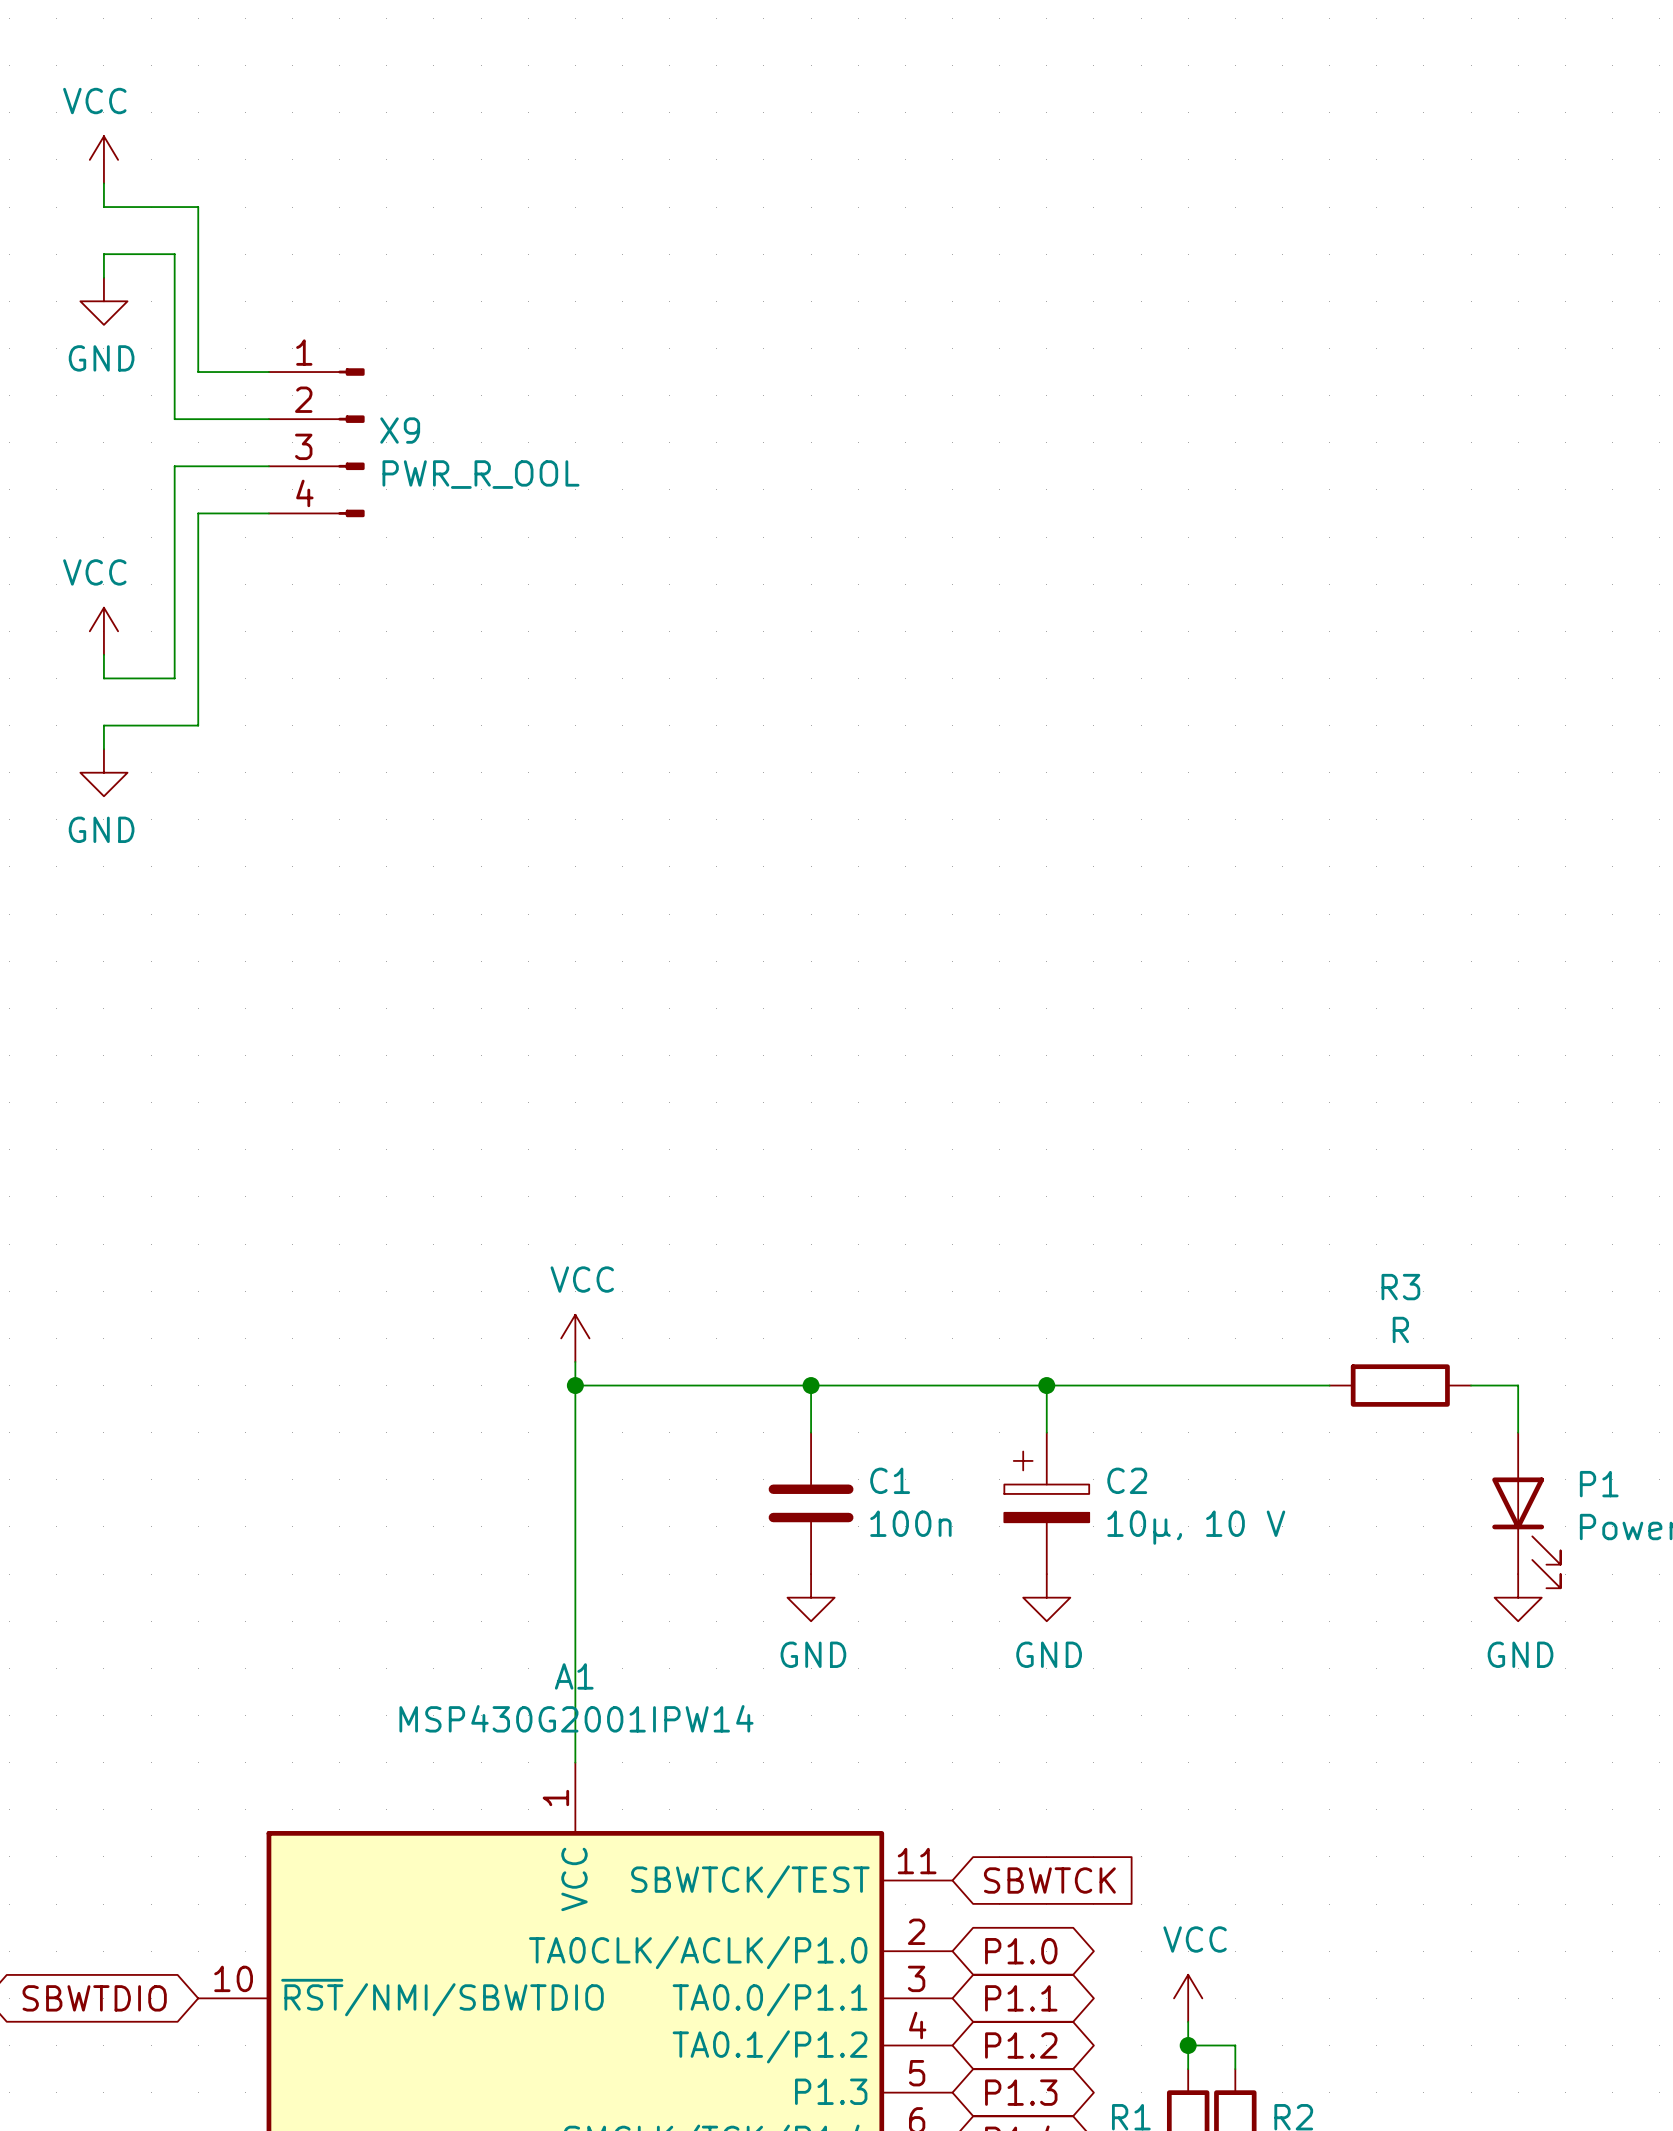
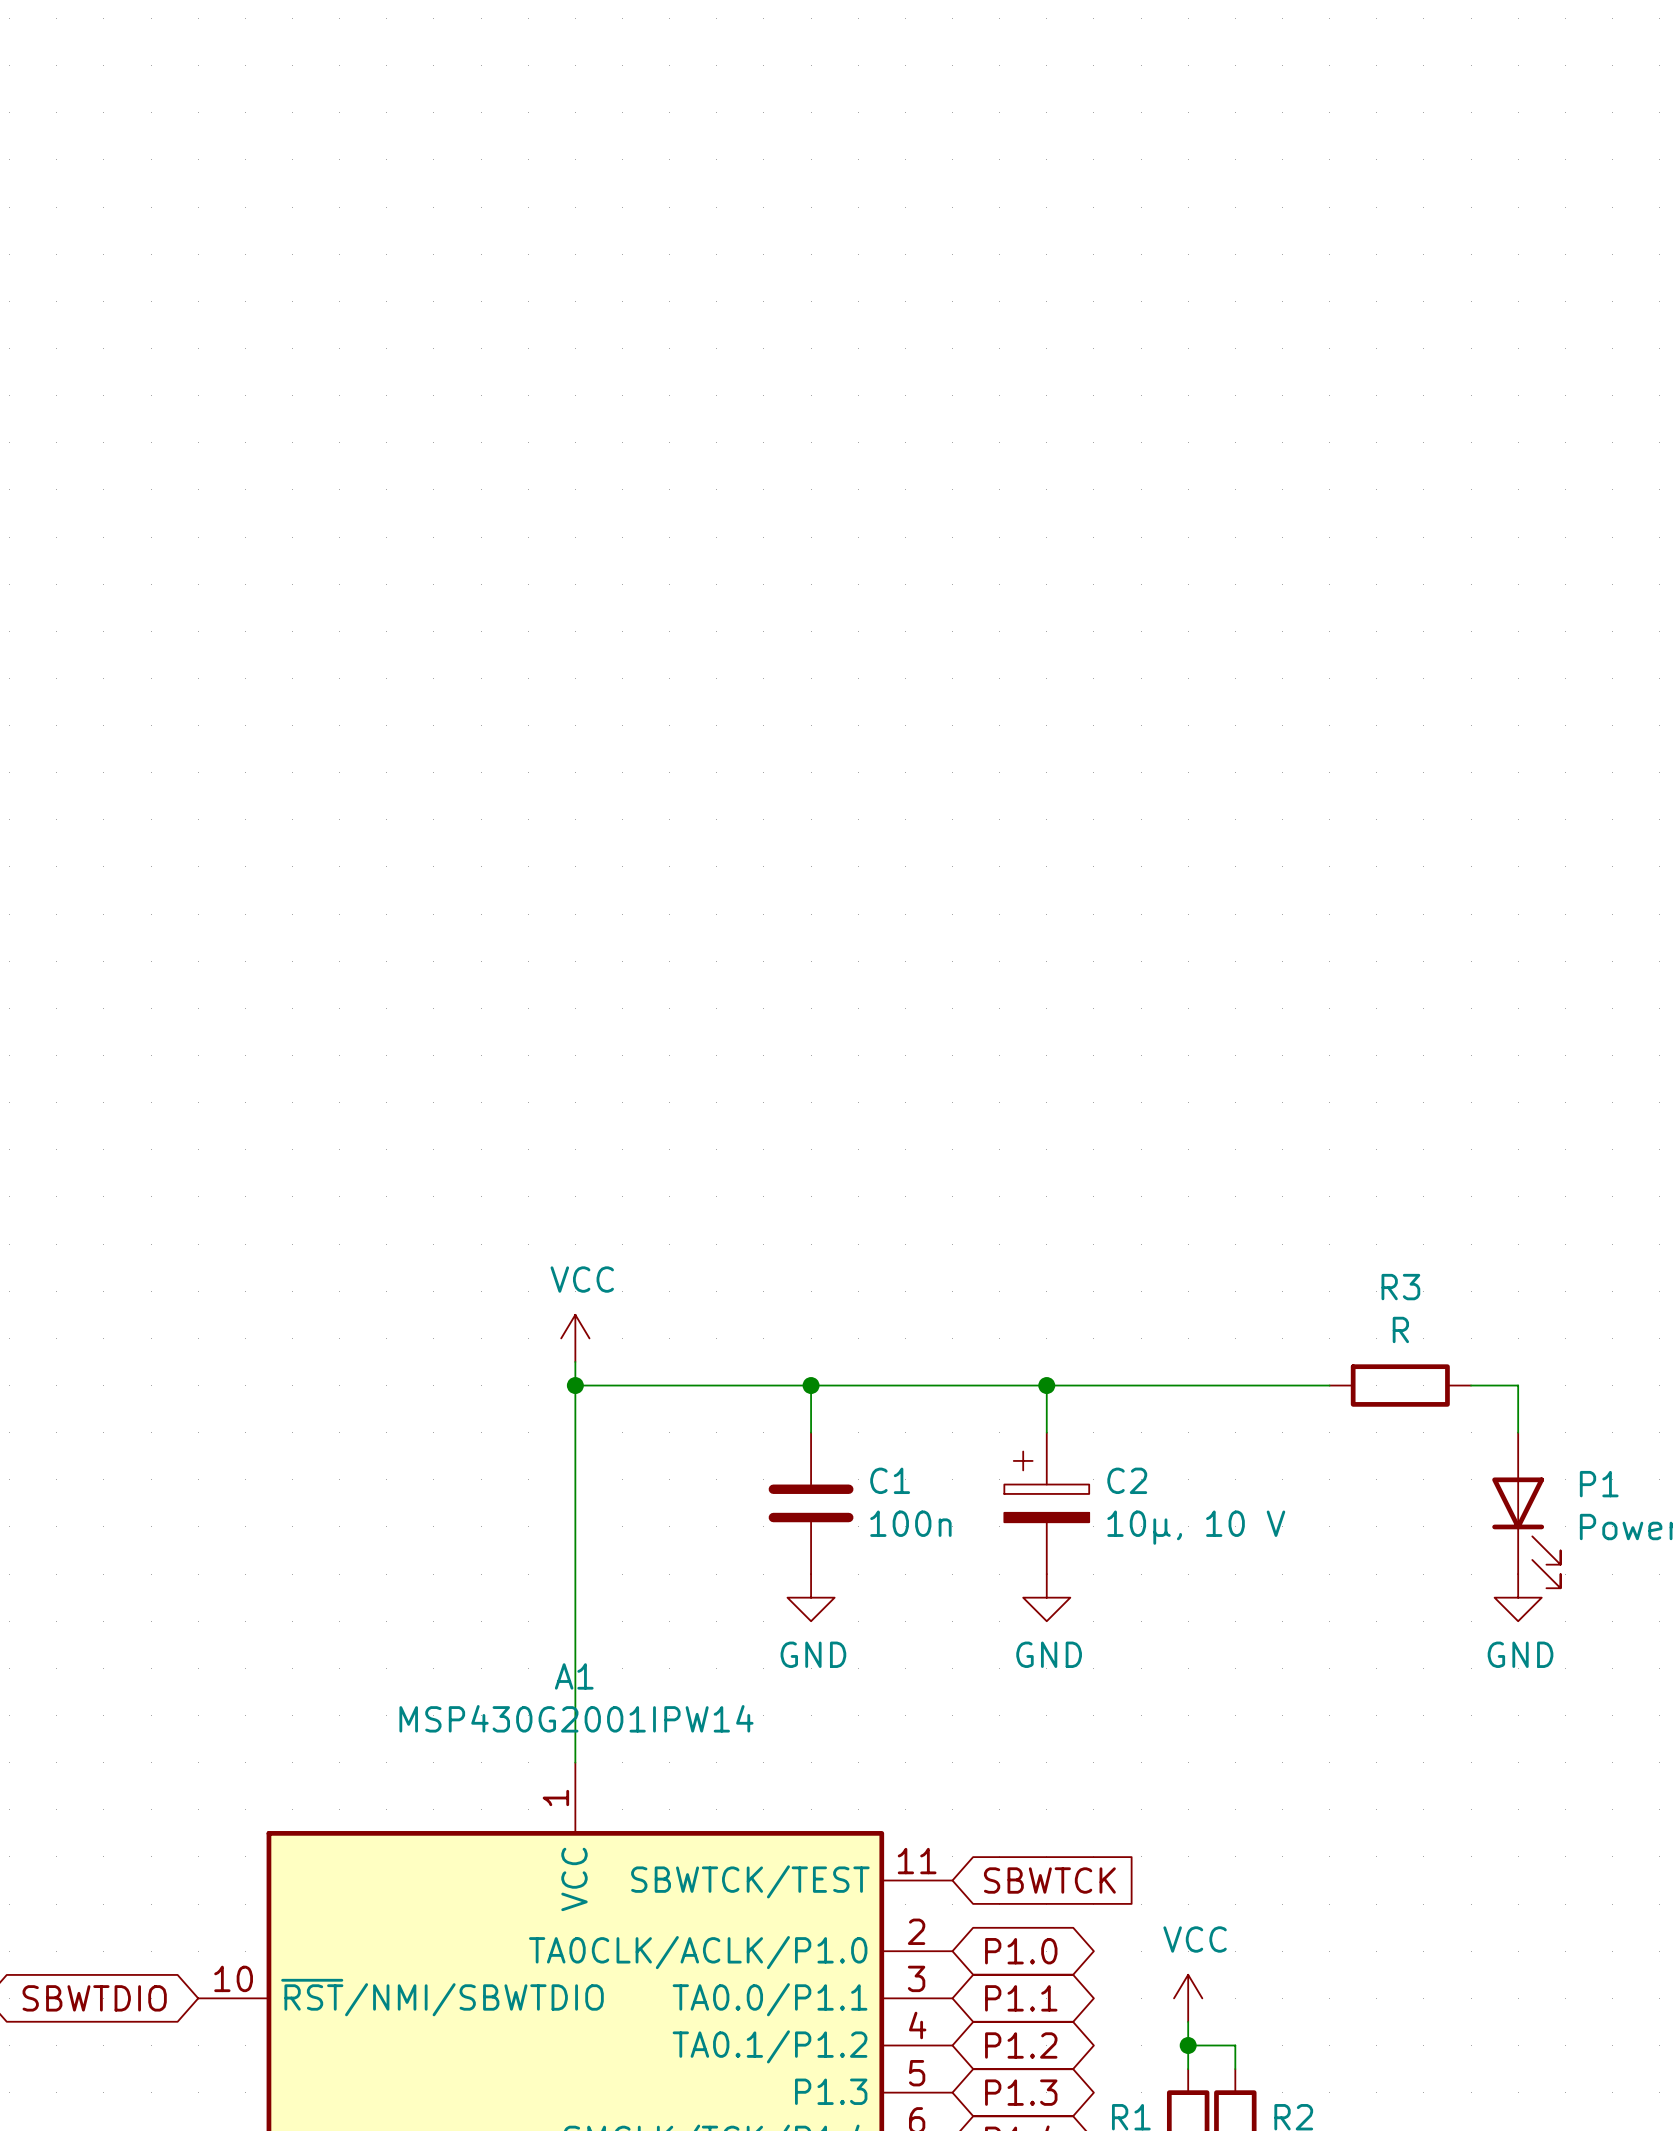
power symbol: VCC (103, 159) -> none
wire: (103, 183) (103, 207) (198, 207) (198, 372) (268, 372) -> none
wire: (103, 277) (103, 254) (174, 254) (174, 419) (268, 419) -> none
power symbol: GND (103, 301) -> none
X9: PWR_R_OOL (316, 442) -> none
wire: (268, 466) (174, 466) (174, 678) (103, 678) (103, 654) -> none
wire: (268, 513) (198, 513) (198, 725) (103, 725) (103, 749) -> none
power symbol: VCC (103, 631) -> none
power symbol: GND (103, 772) -> none

